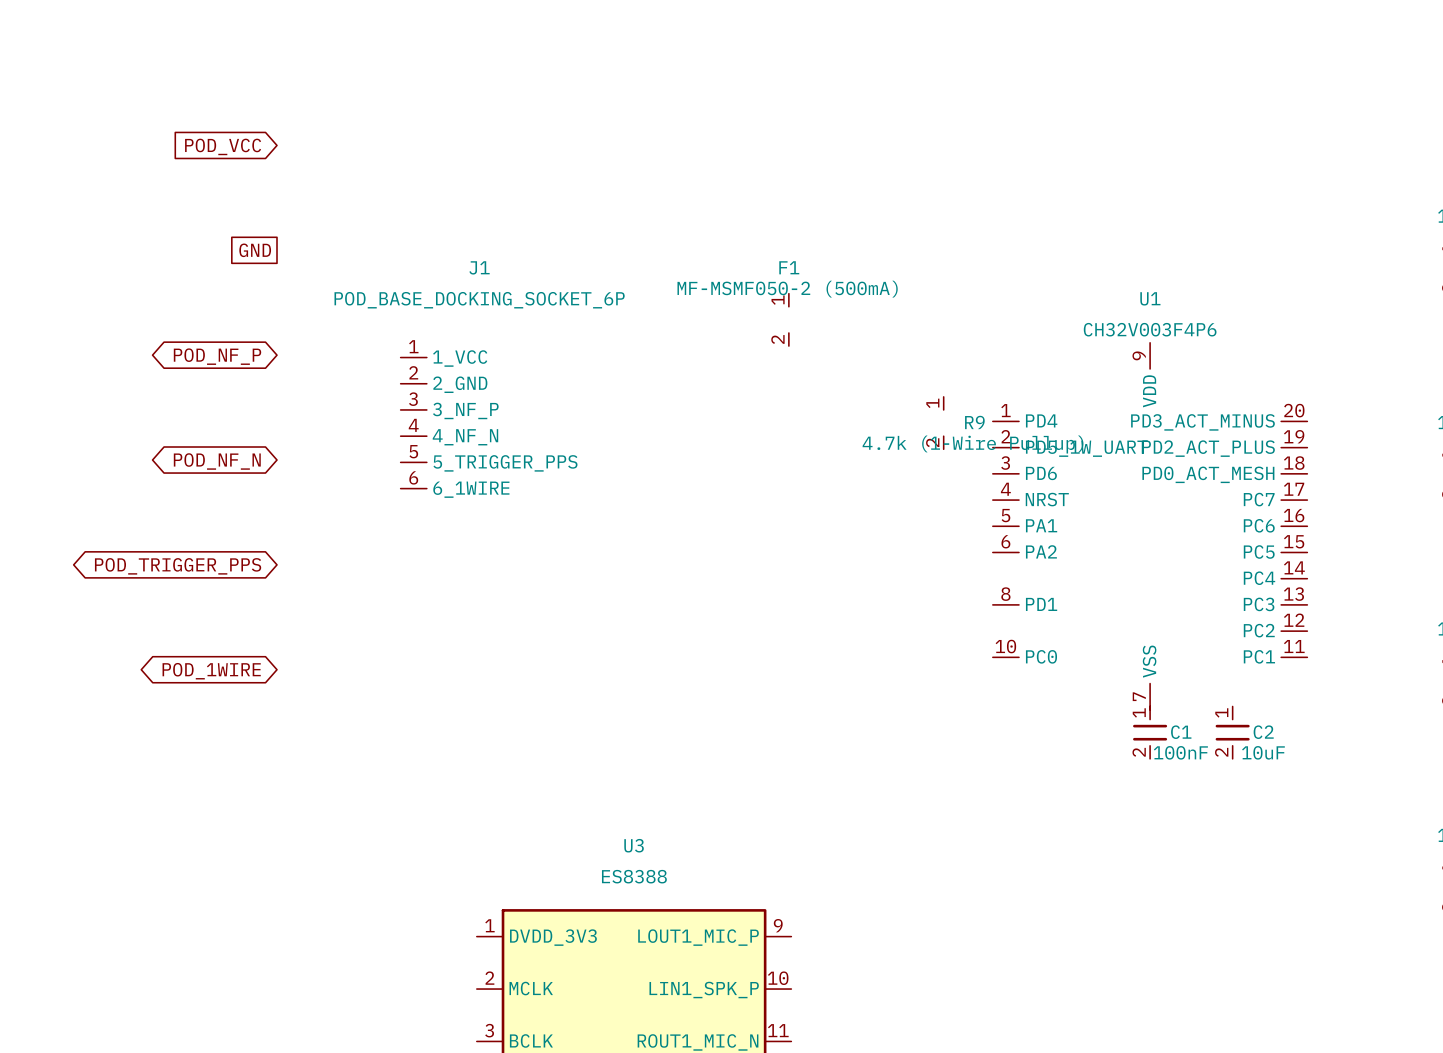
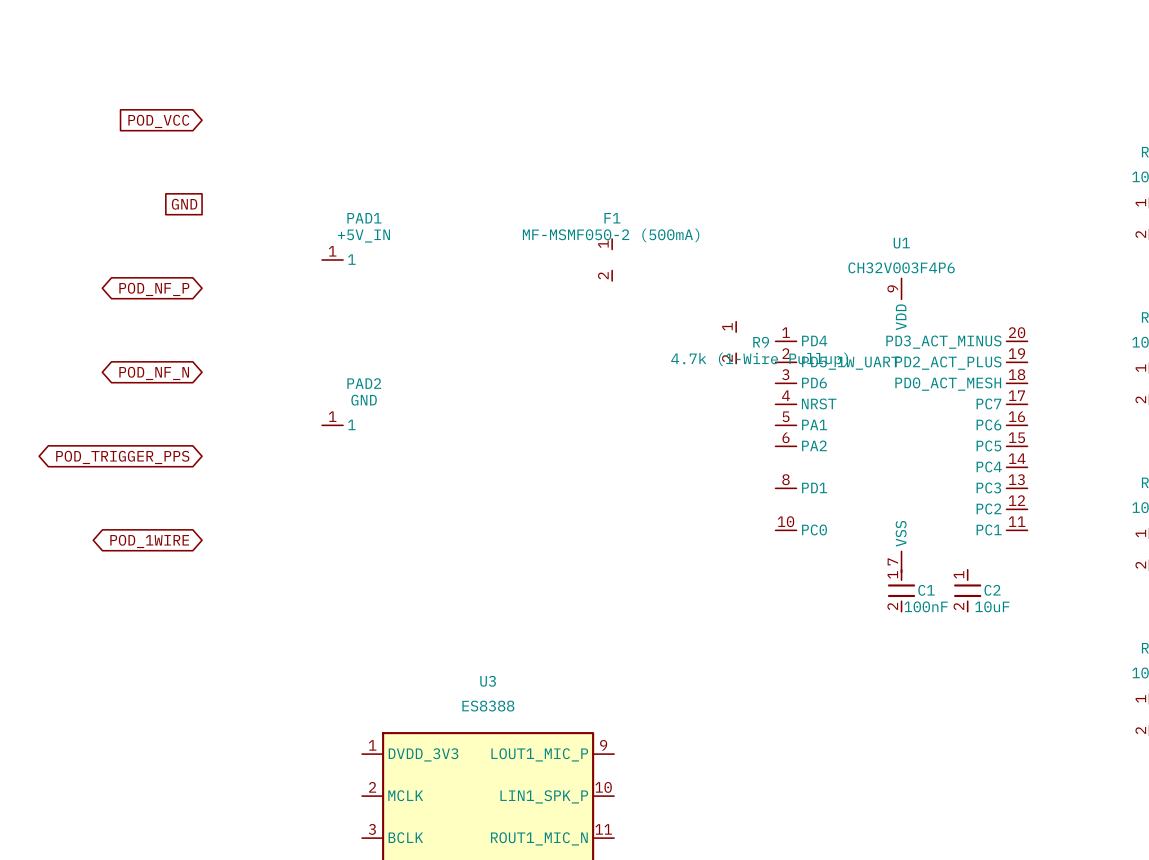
PAD1: none -> +5V_IN (332, 259)
J1: POD_BASE_DOCKING_SOCKET_6P (413, 423) -> none
PAD2: none -> GND (332, 425)

